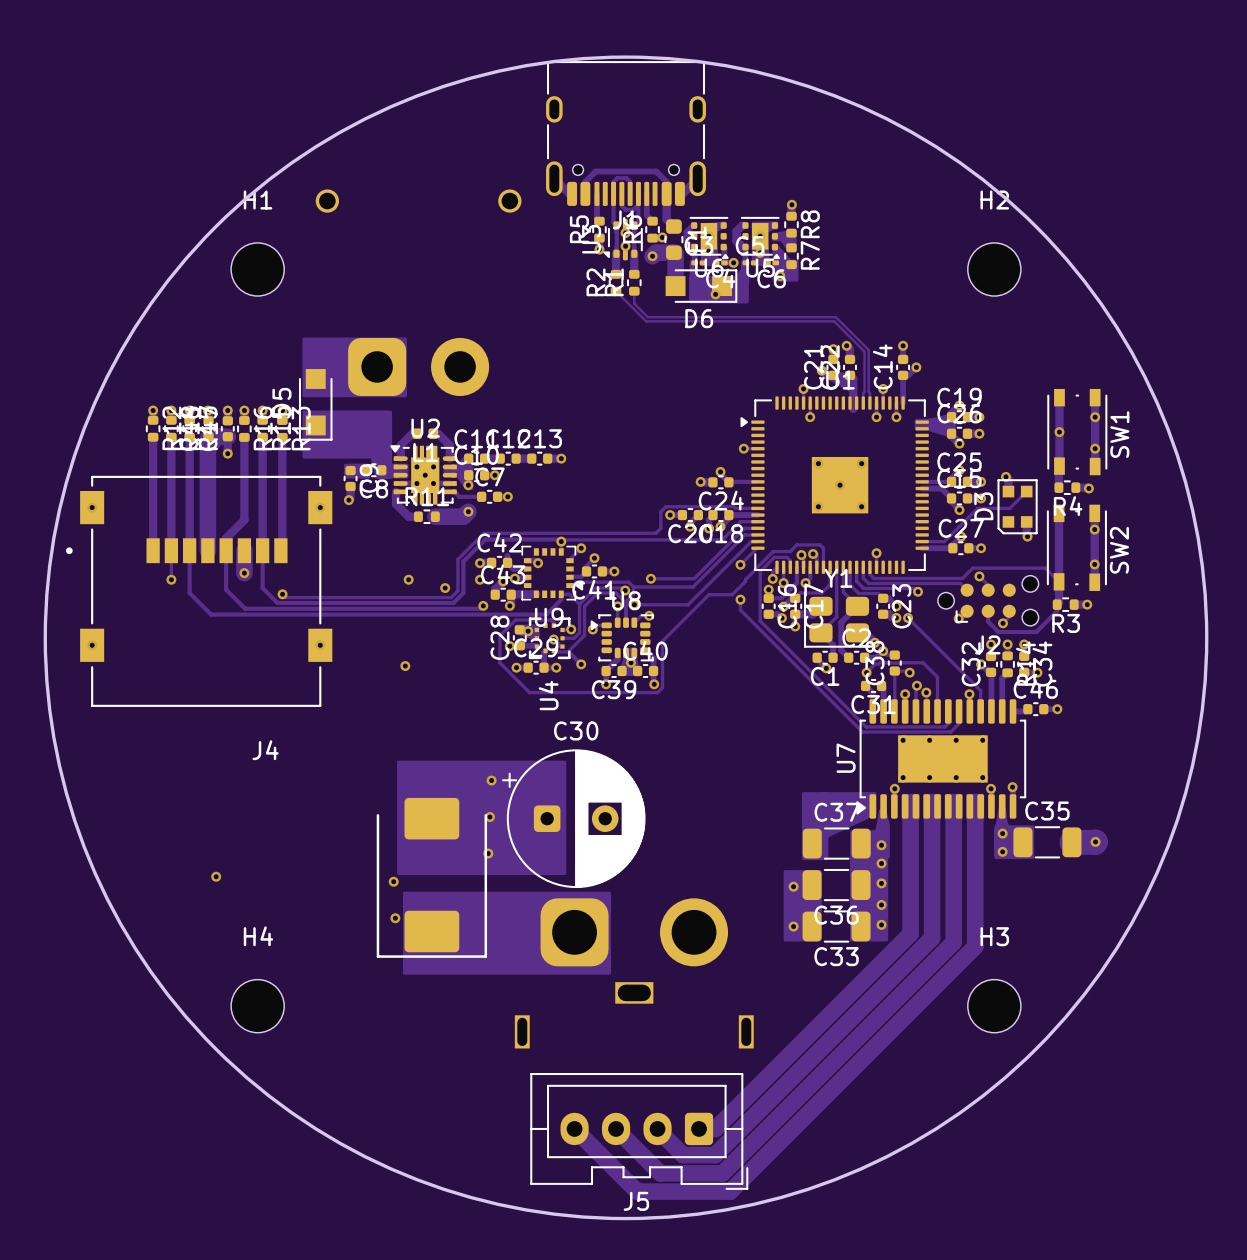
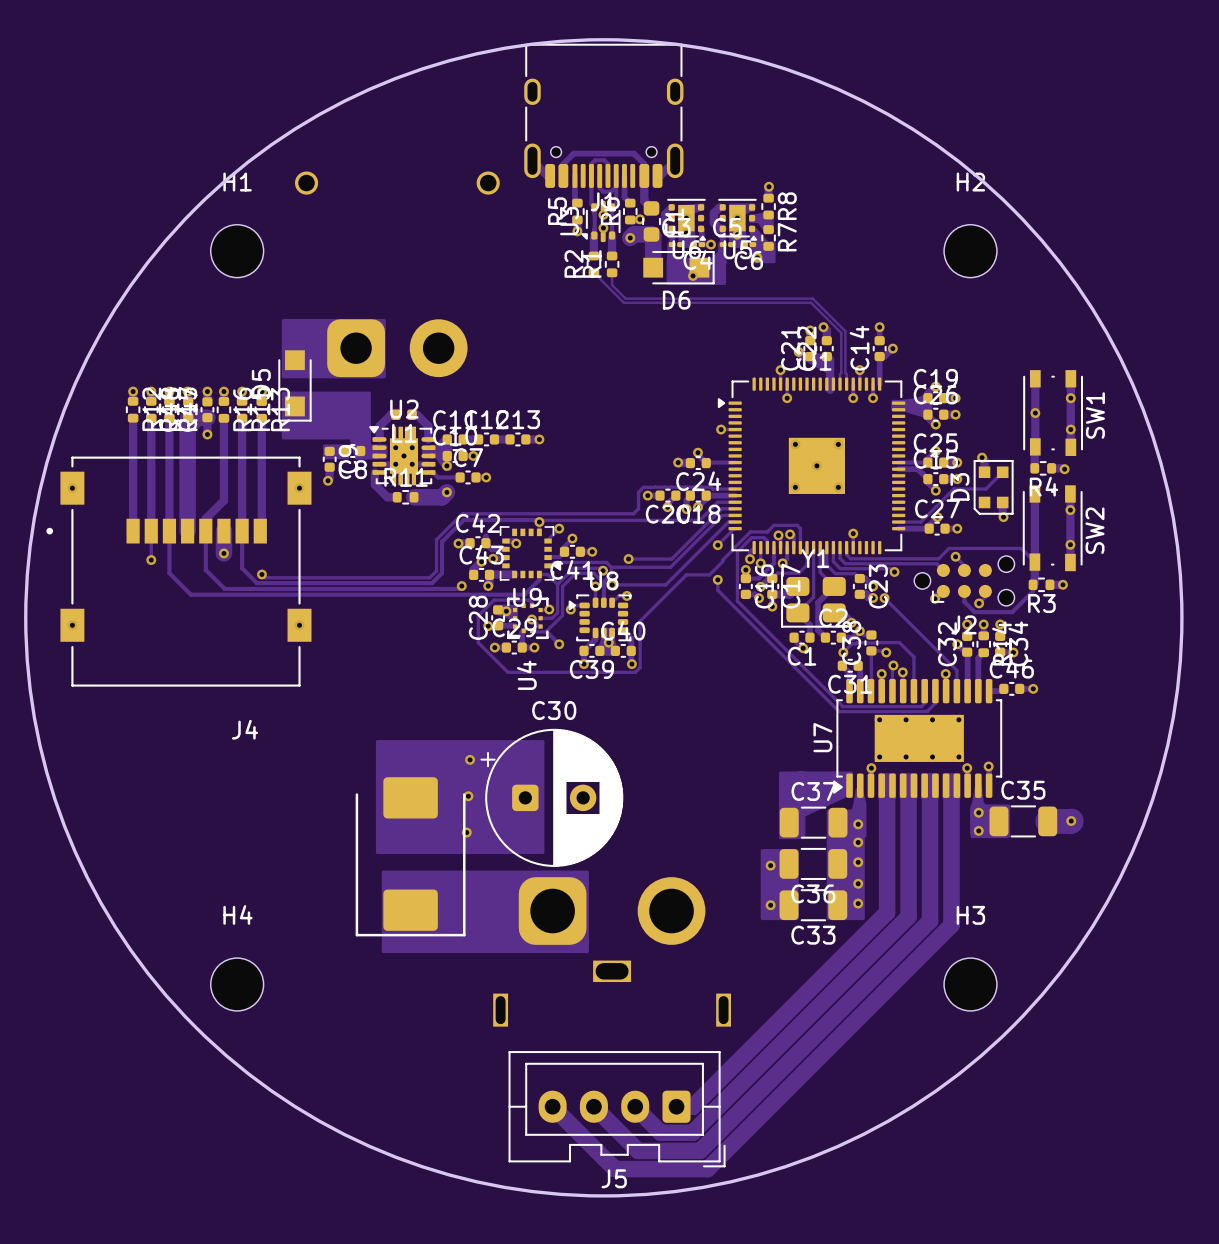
via: (408, 579) -> none
via: (480, 579) -> none
via: (445, 588) -> none
via: (405, 666) -> none
via: (216, 876) -> none
via: (393, 881) -> none
via: (395, 918) -> none

